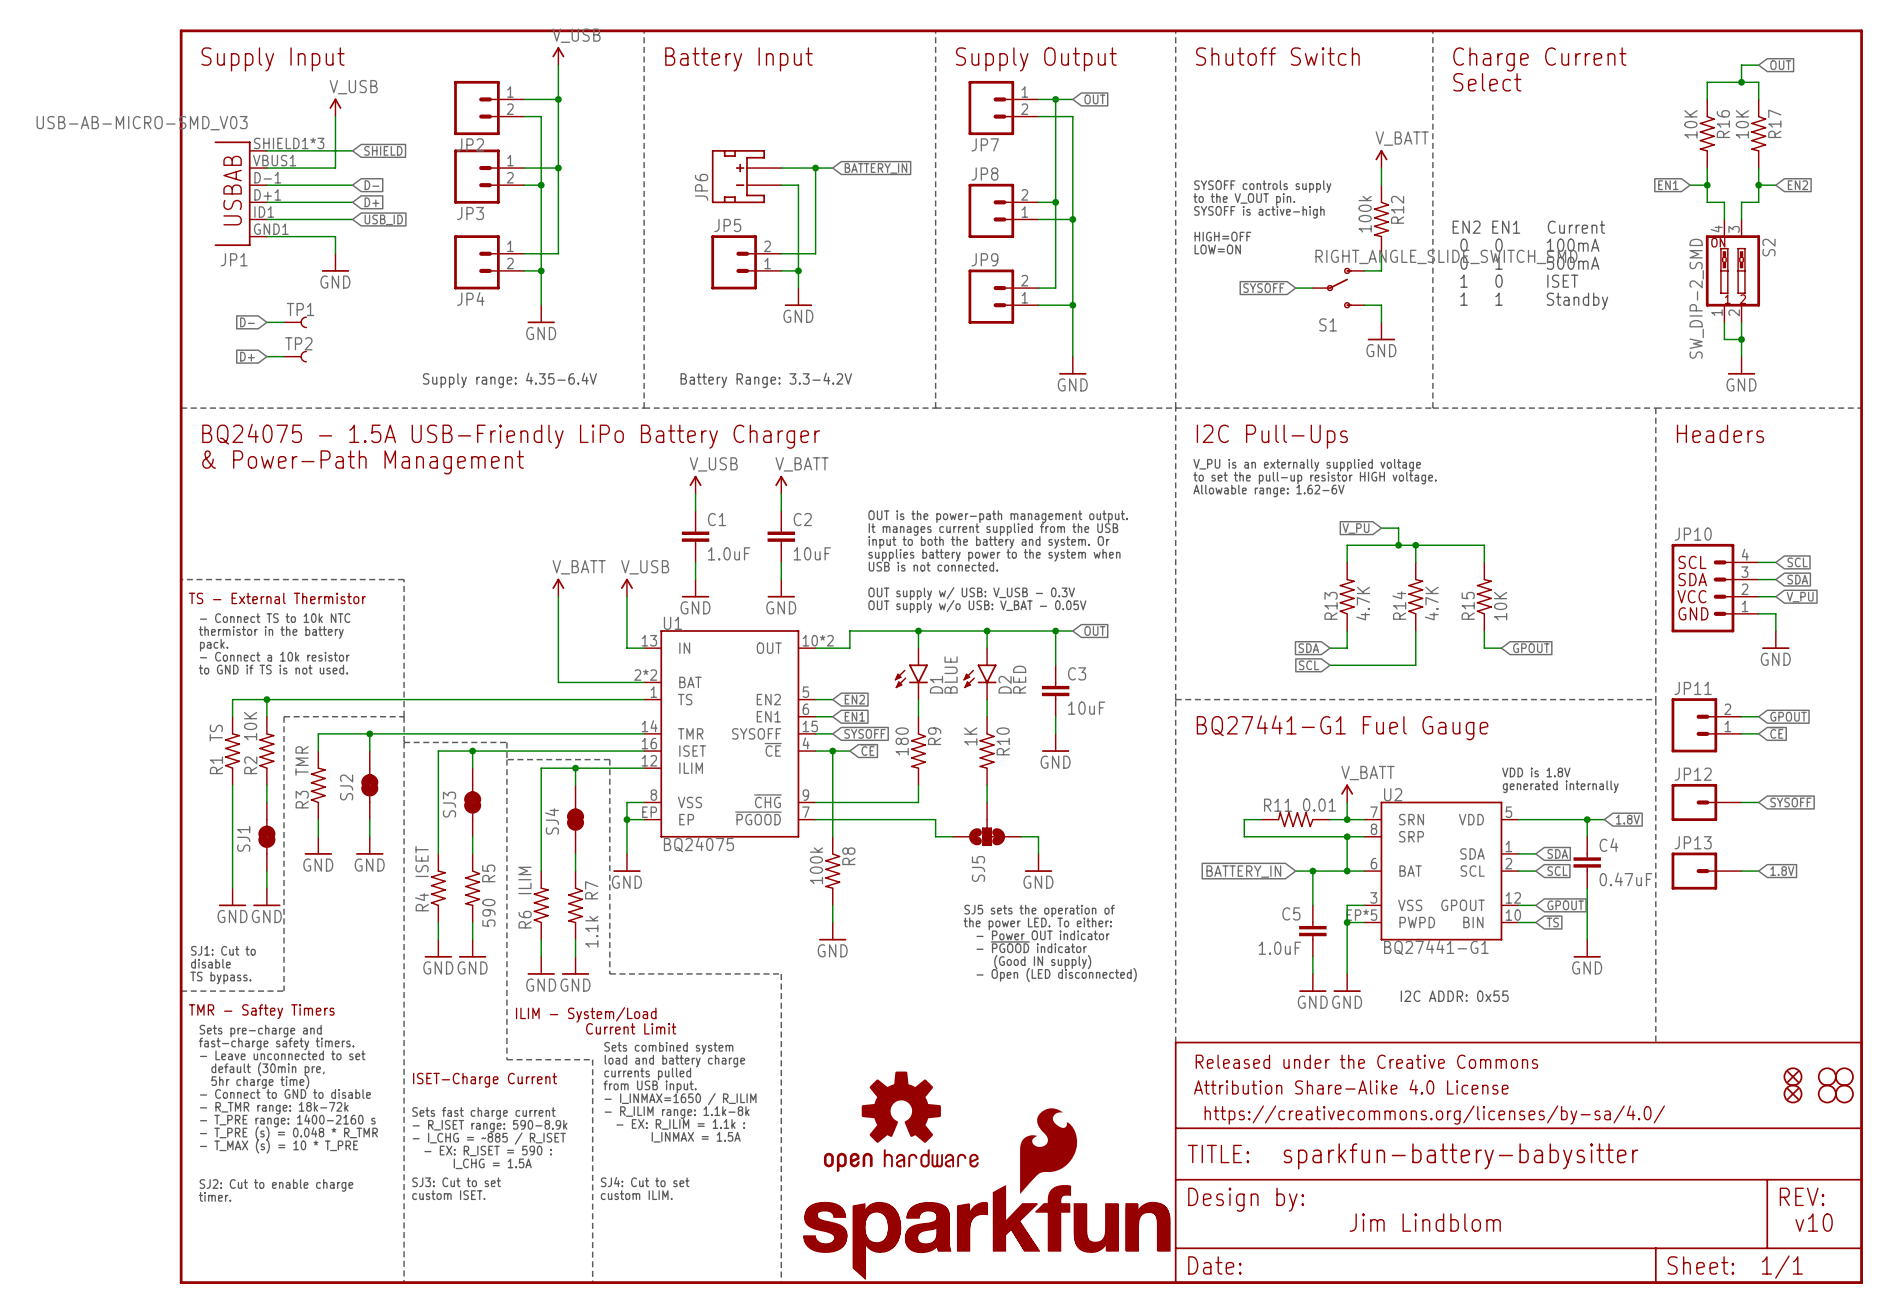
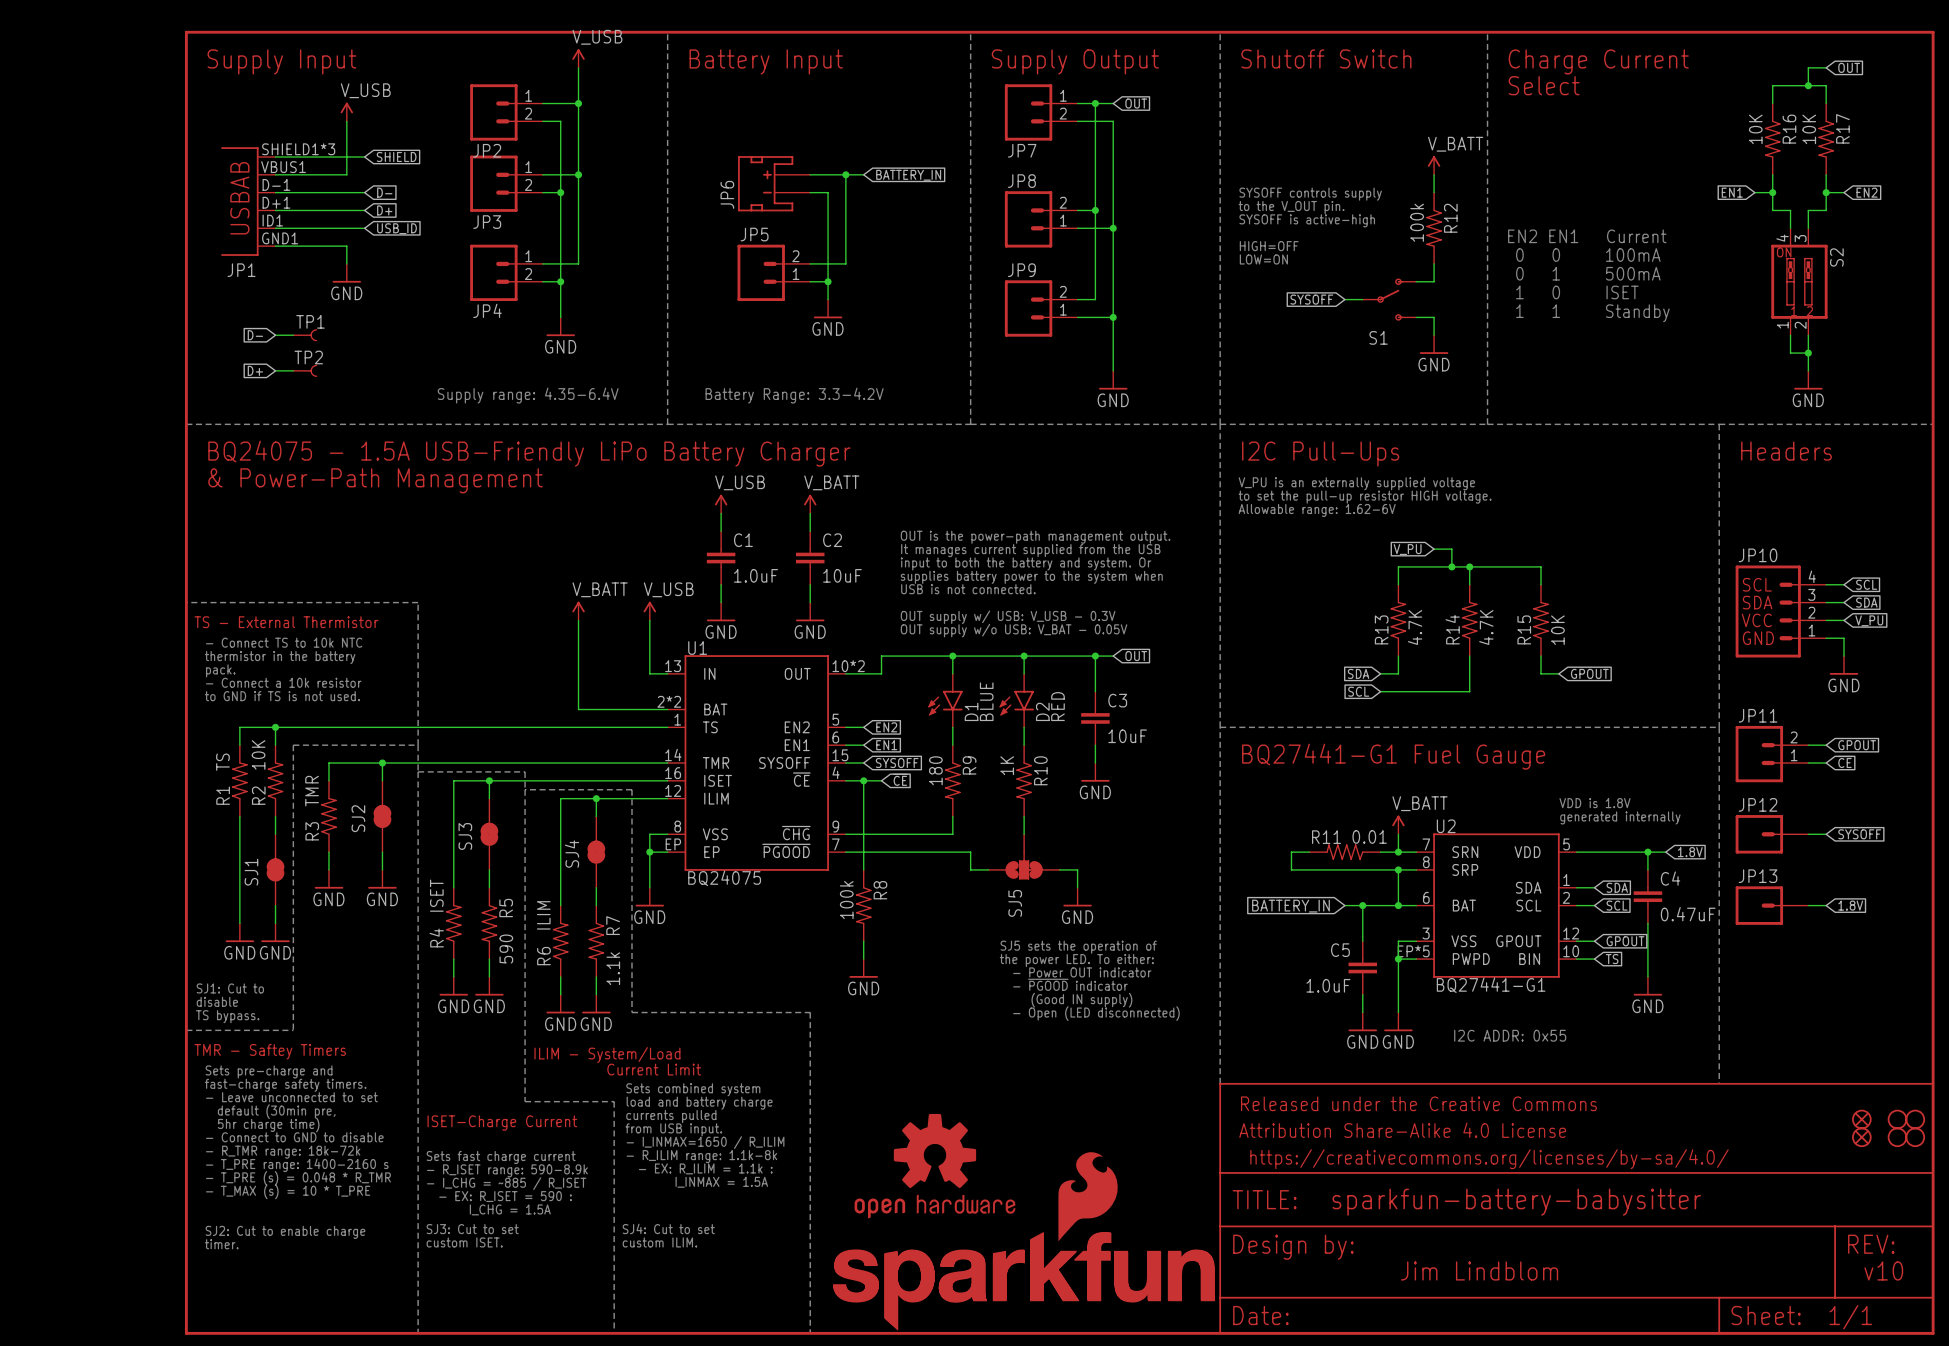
JP1 value: USB-AB-MICRO-SMD_V03 (142, 123) -> none
S1 value: RIGHT_ANGLE_SLIDE_SWITCH_SMD (1446, 256) -> none
S2 value: SW_DIP-2_SMD (1696, 298) -> none

